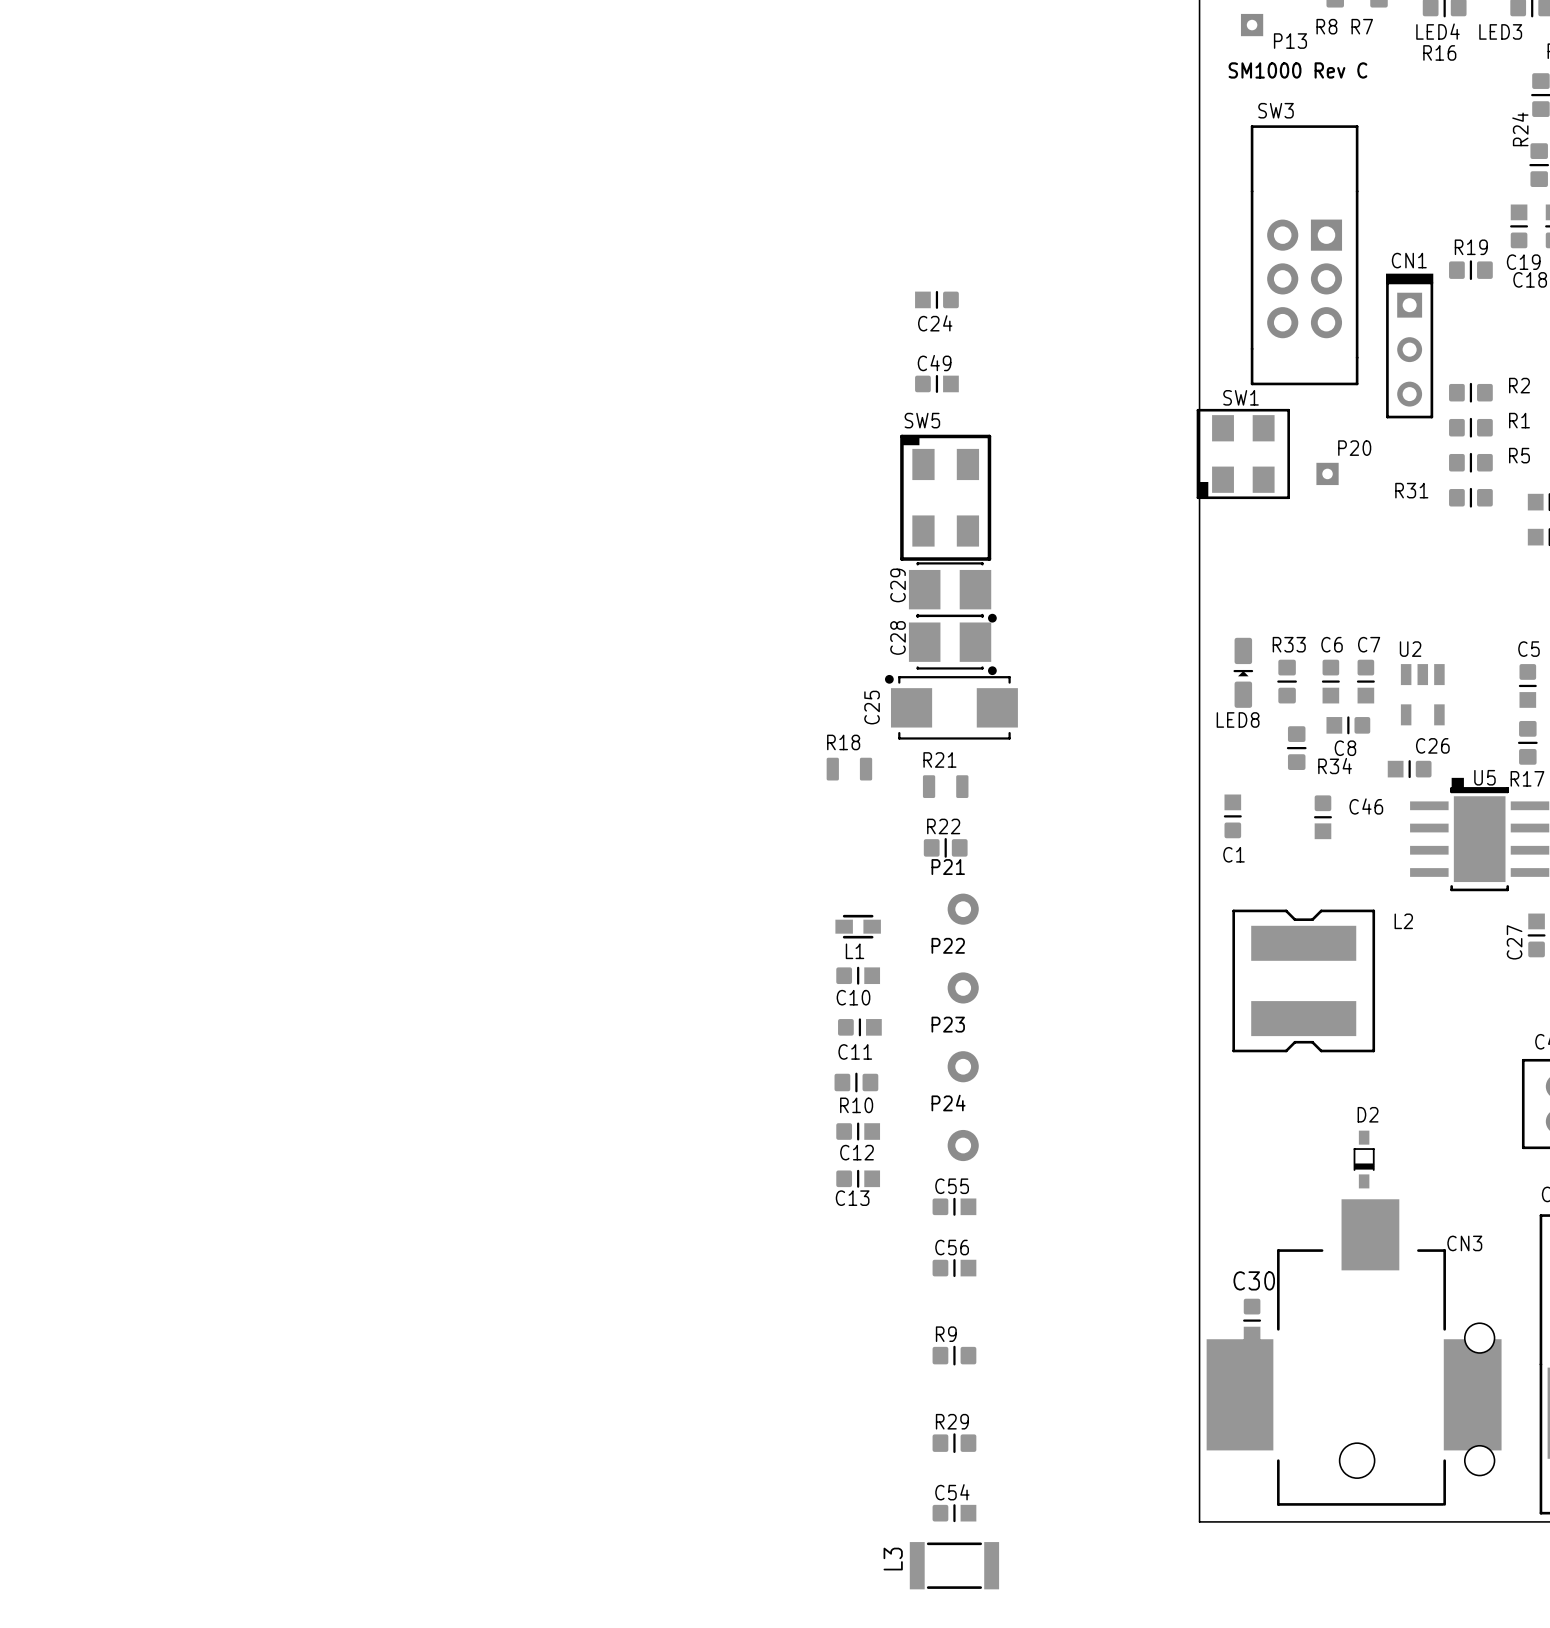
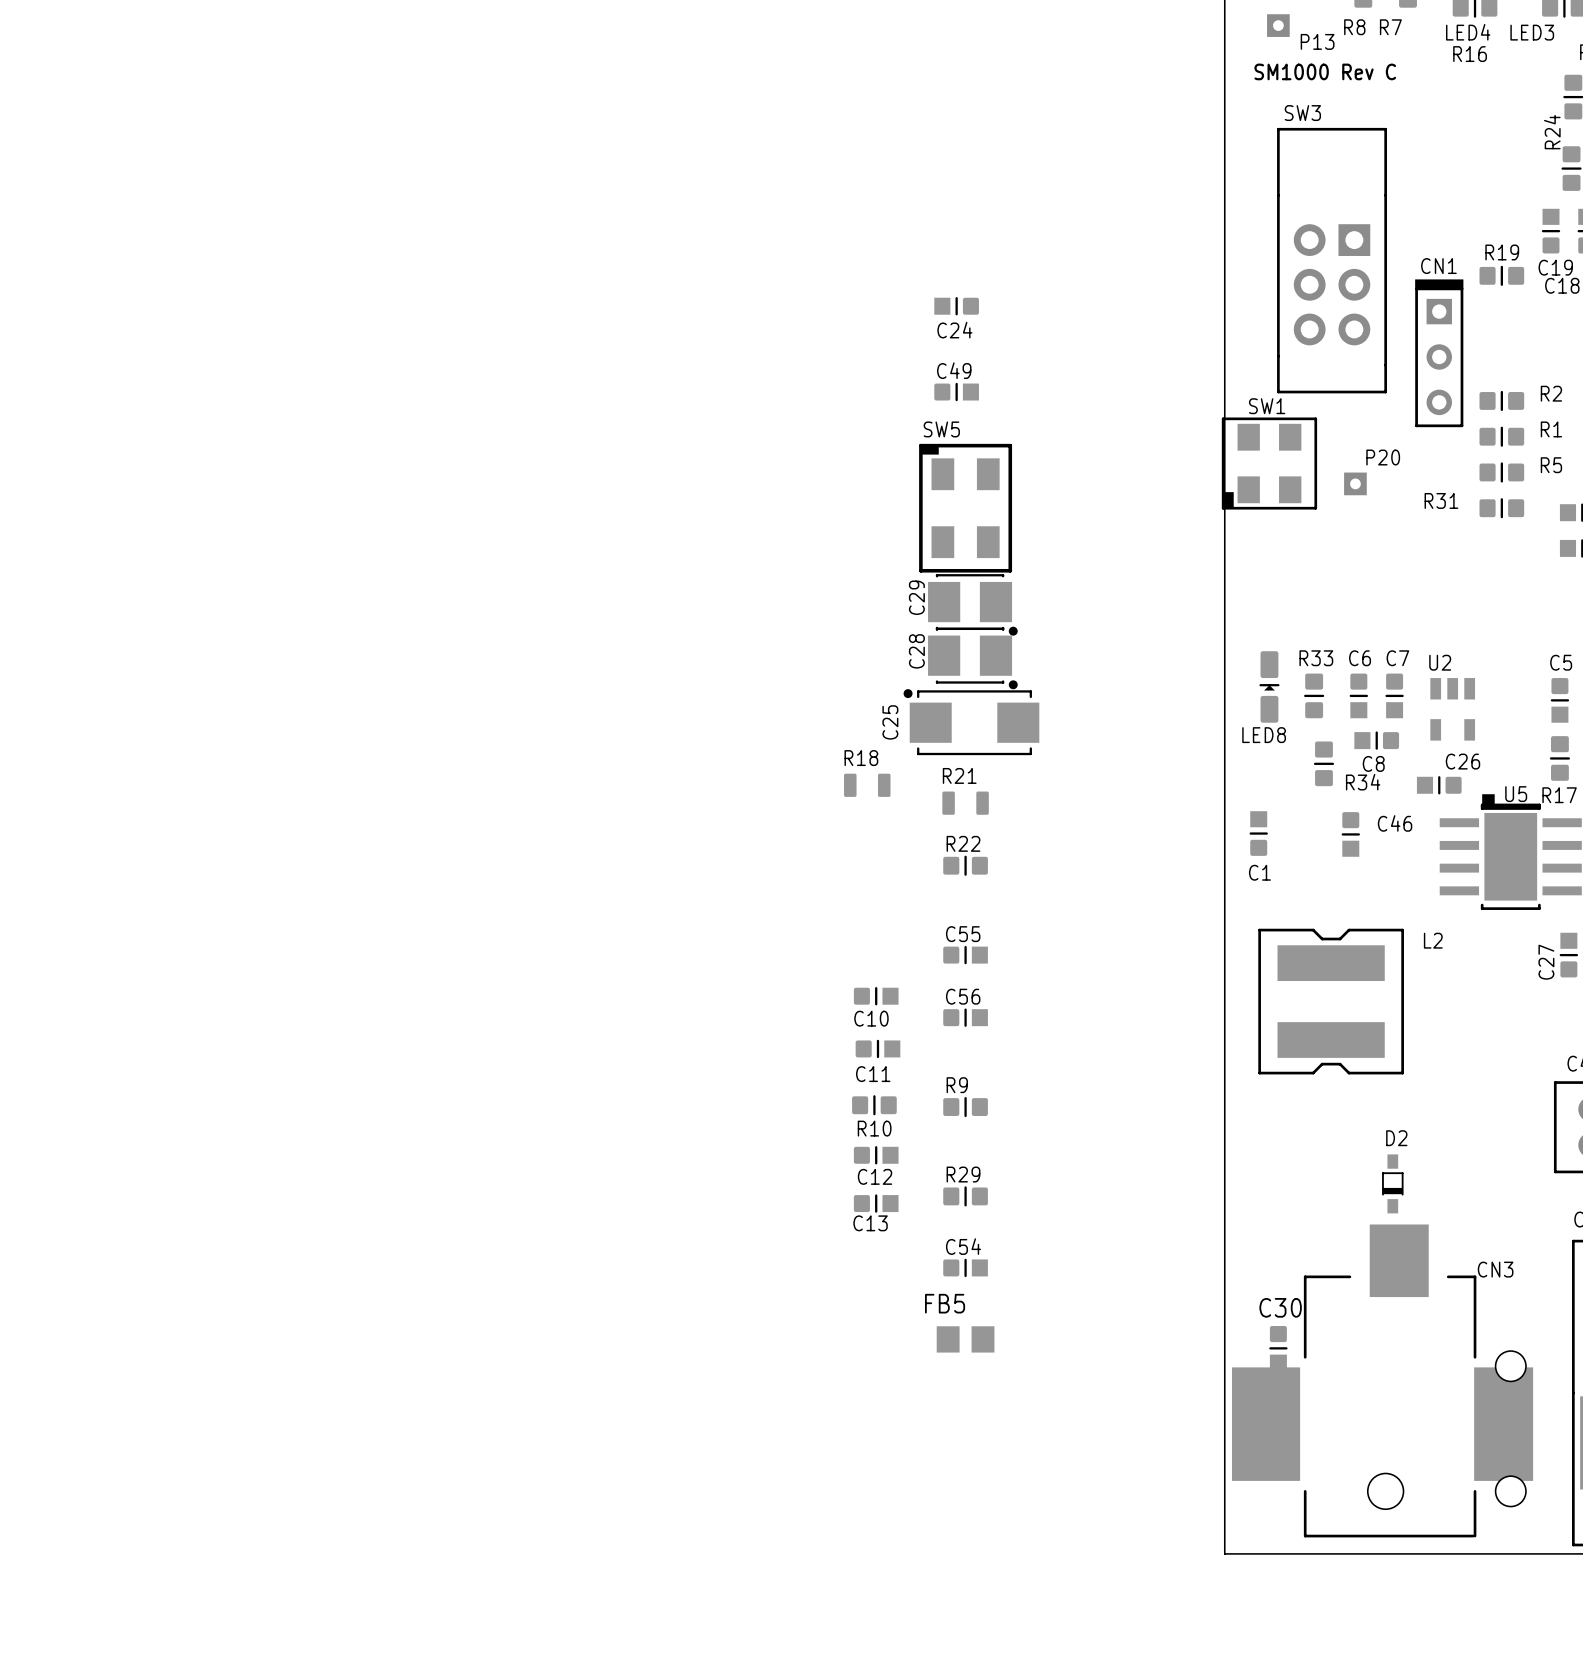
P21: (963, 909) -> none
L1: (858, 926) -> none
P22: (963, 987) -> none
P23: (963, 1066) -> none
P24: (963, 1145) -> none
C55 position: (954, 1206) -> (965, 955)
C56 position: (954, 1268) -> (965, 1017)
FB5: none -> (965, 1339)
R9 position: (954, 1355) -> (965, 1107)
R29 position: (954, 1443) -> (965, 1196)
C54 position: (954, 1513) -> (965, 1267)
L3: (954, 1565) -> none

